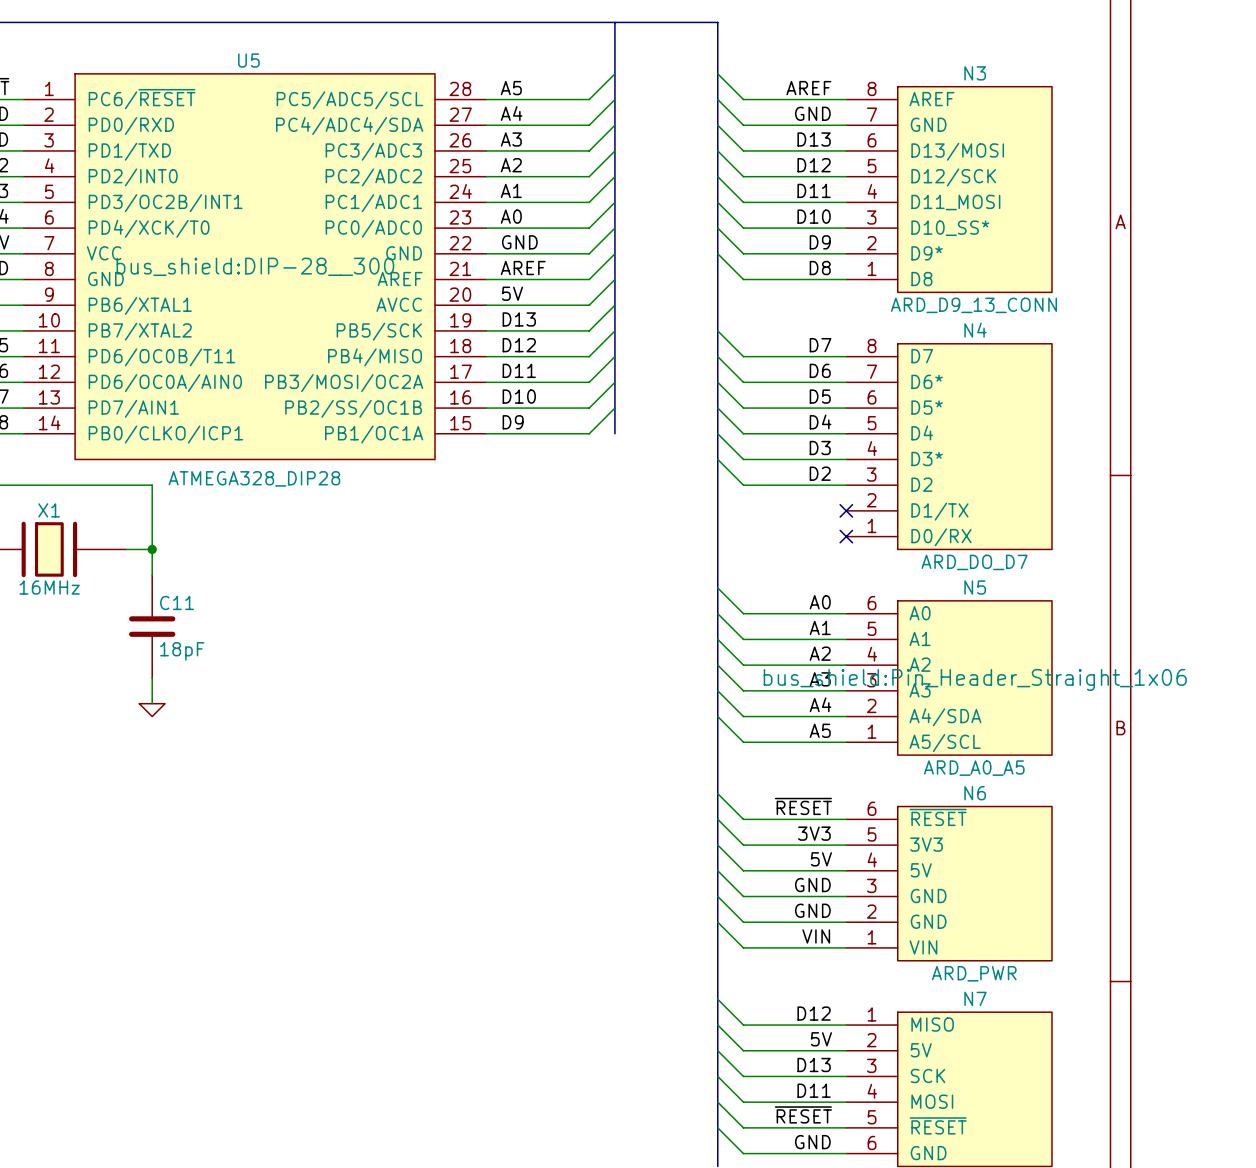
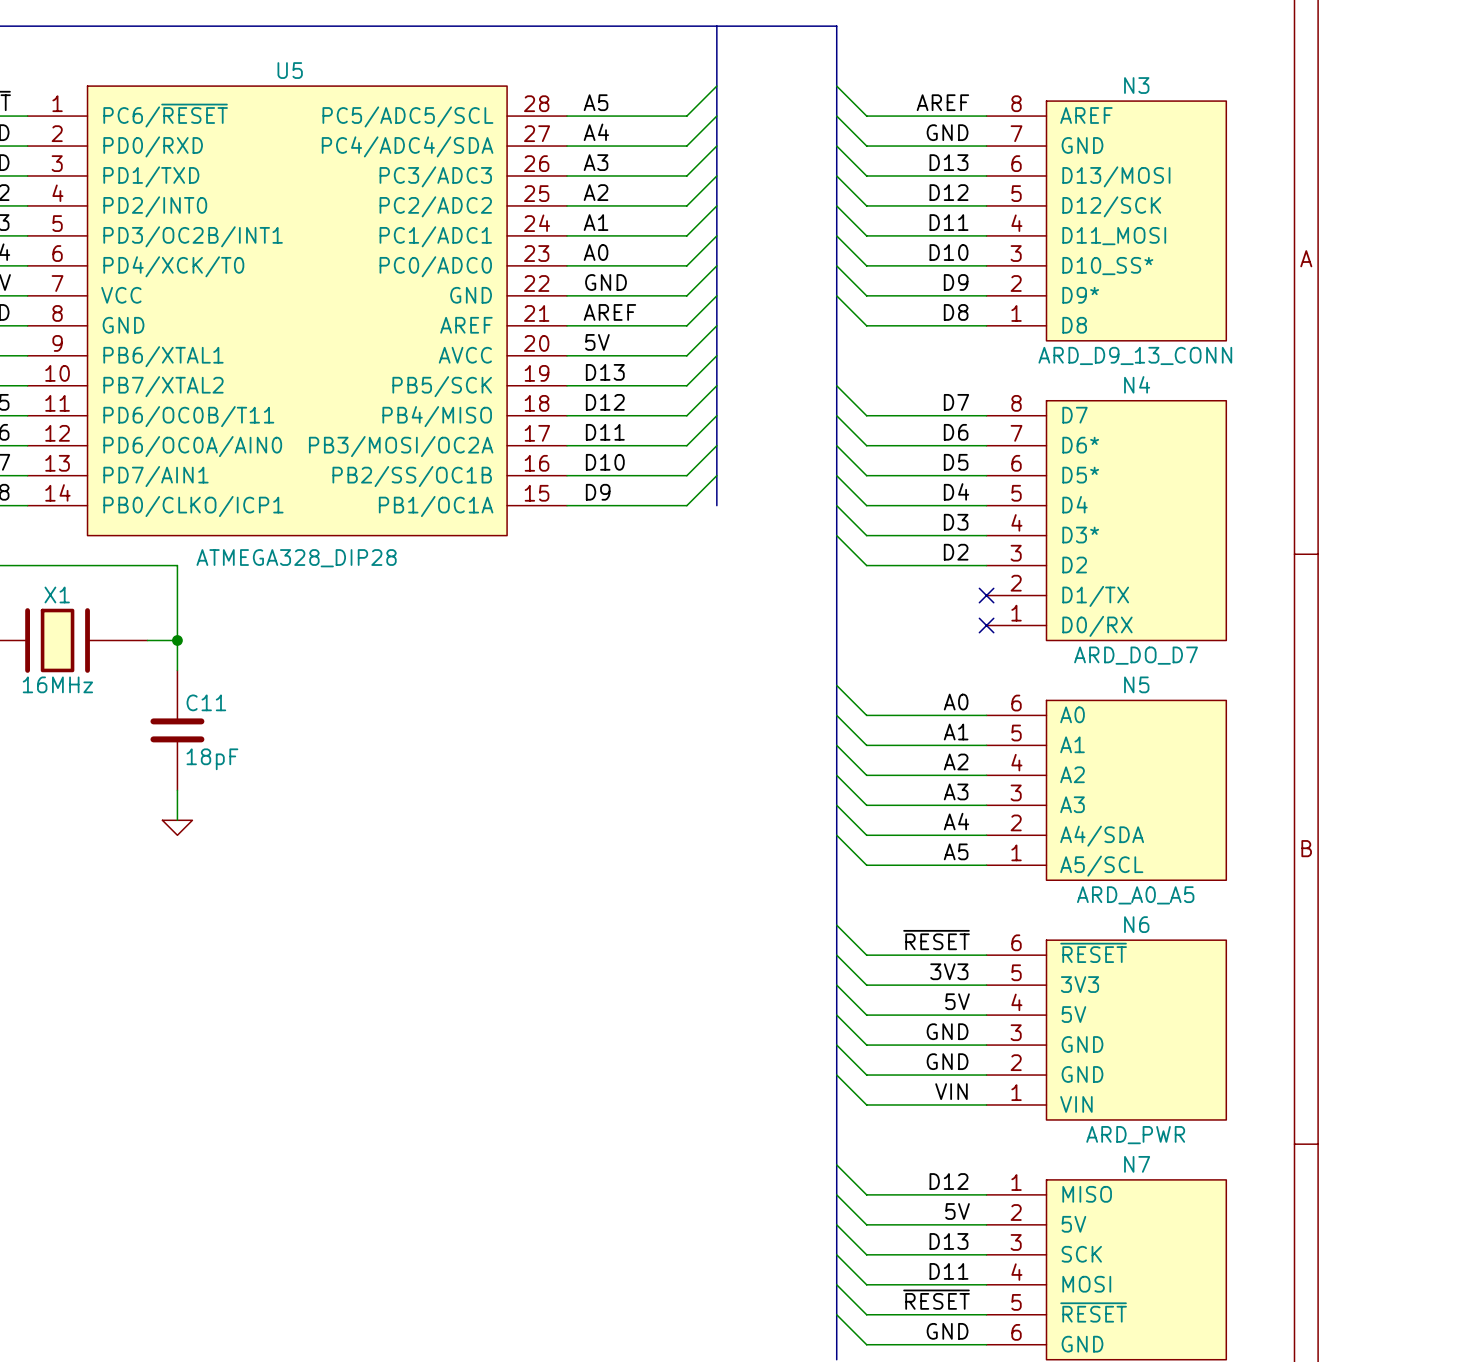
U5 text: bus_shield:DIP-28__300 (255, 266) -> none
N5 text: bus_shield:Pin_Header_Straight_1x06 (975, 679) -> none

